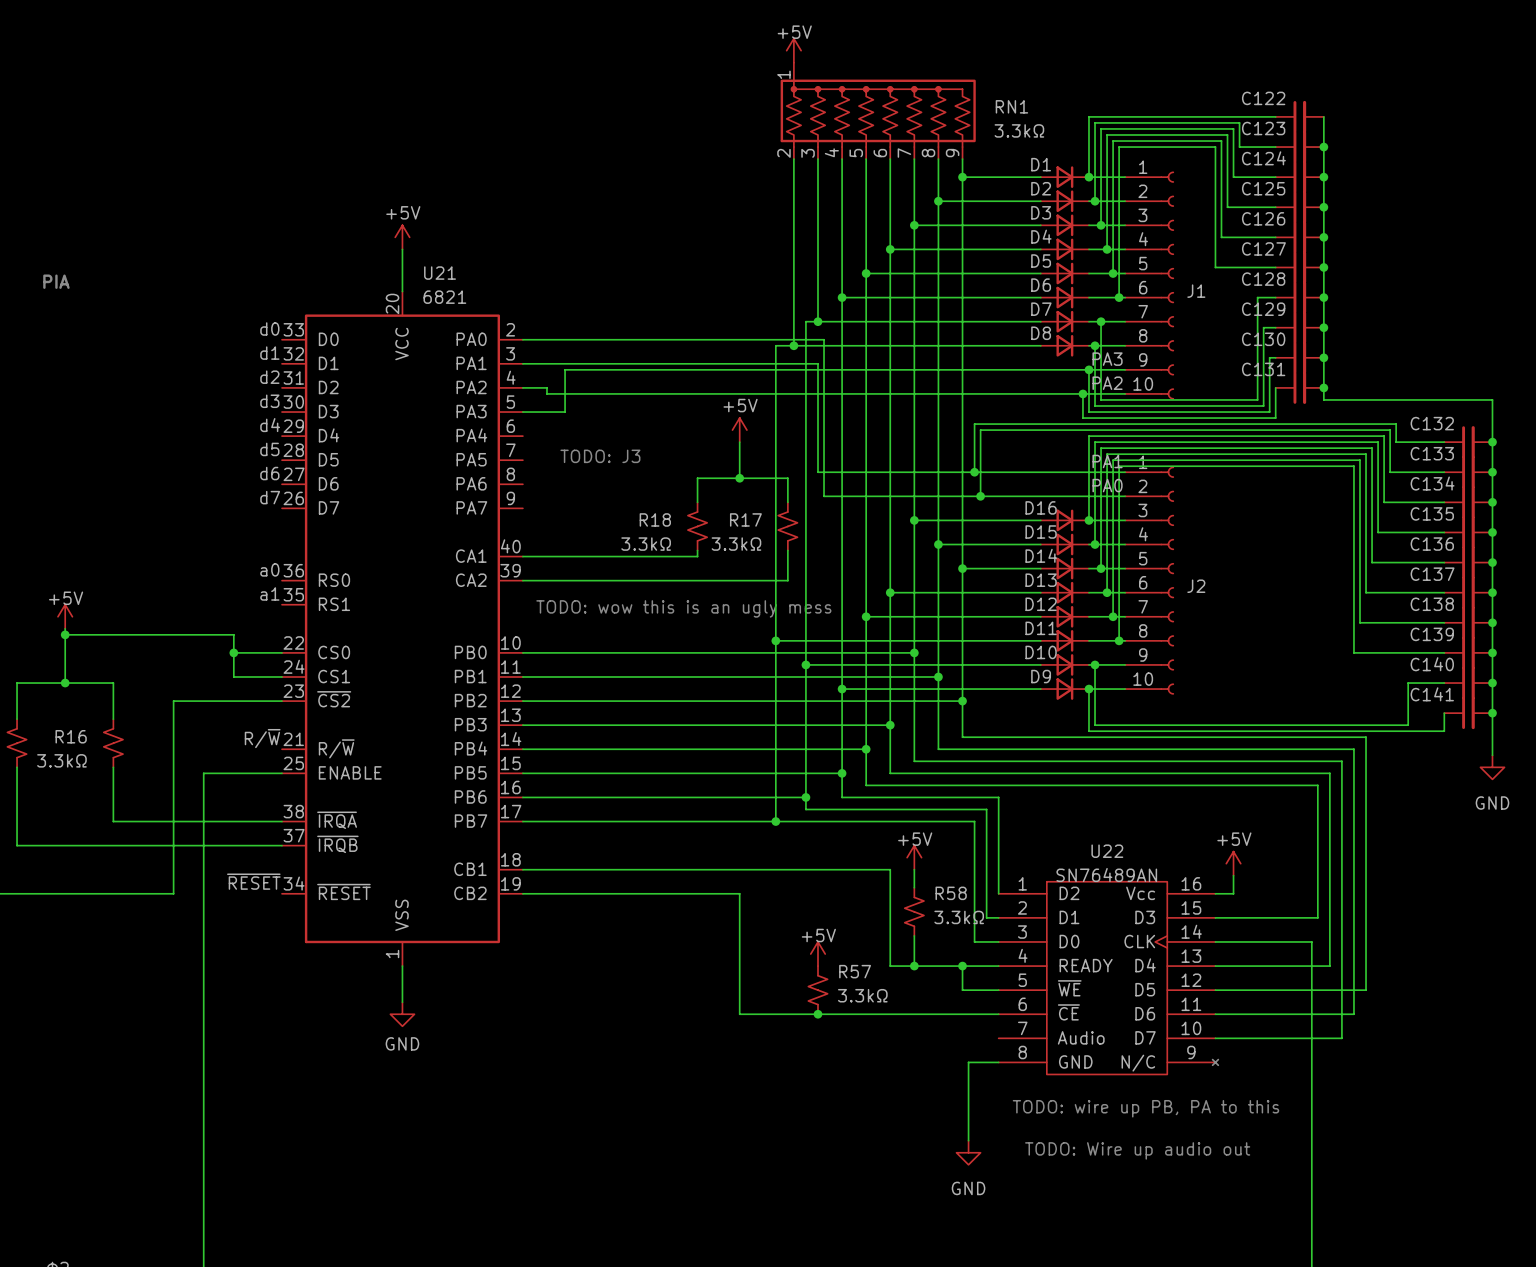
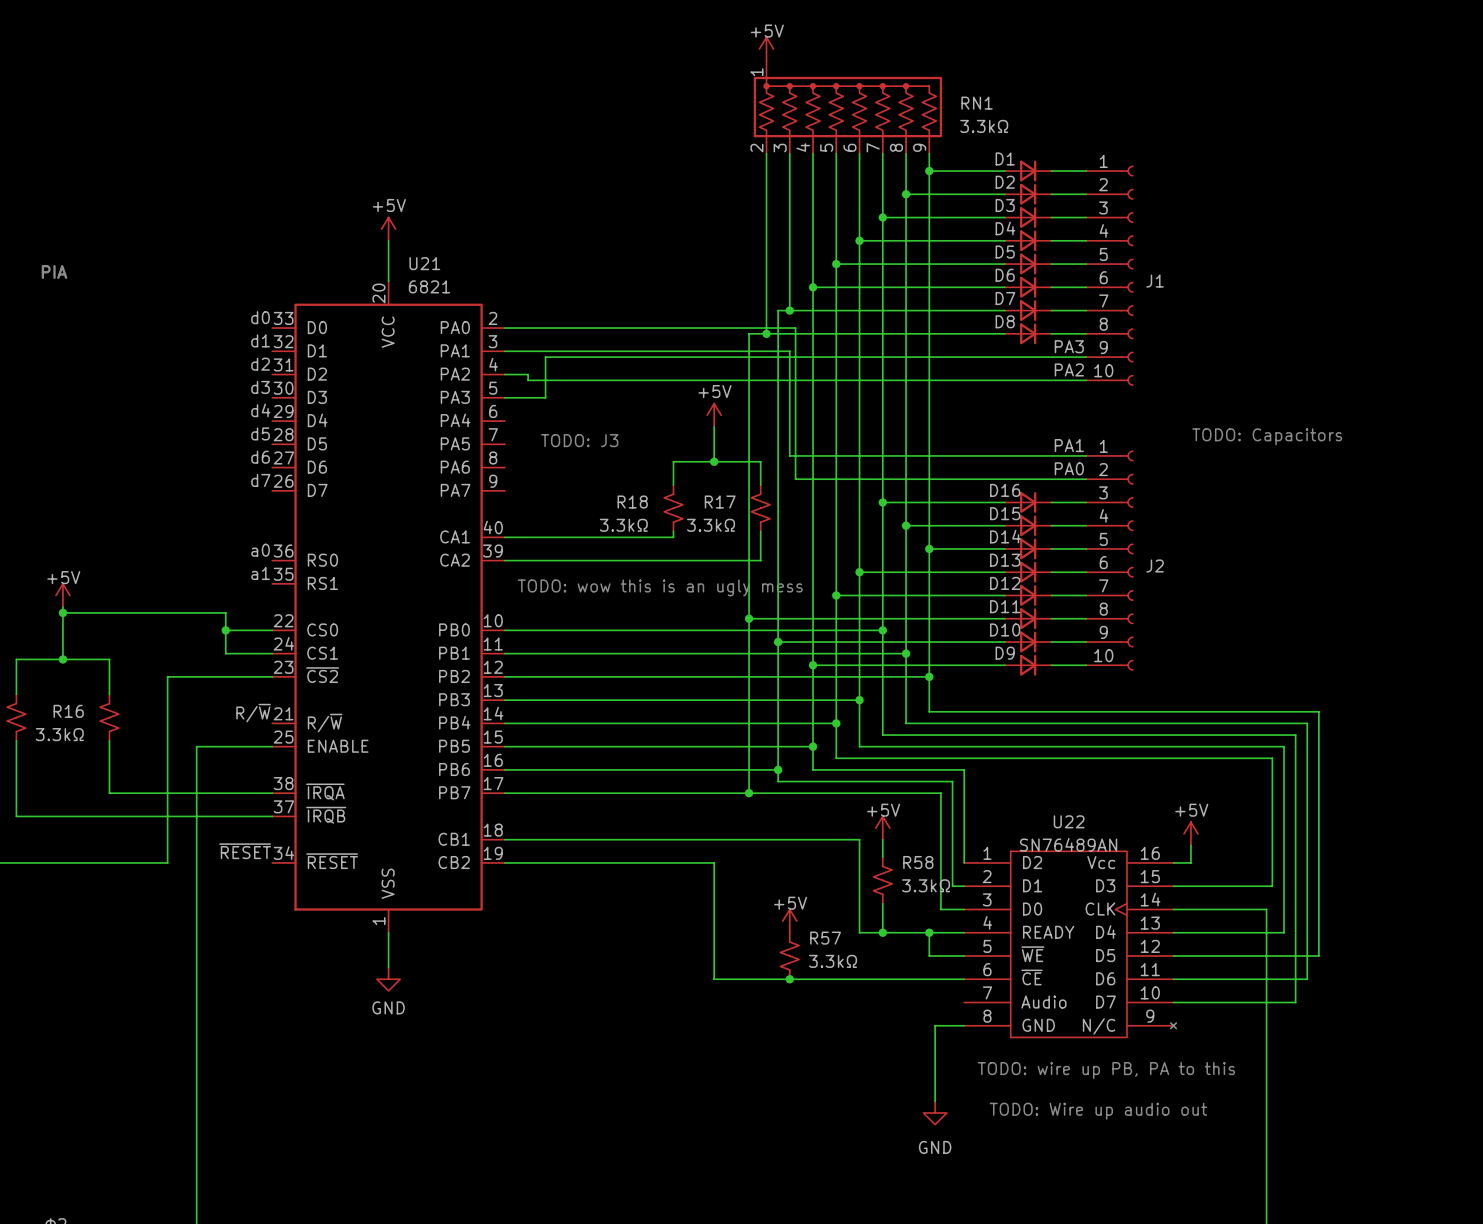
wire: (1275, 116) (1088, 116) (1088, 177) -> none
C122: (1299, 116) -> none
wire: (1323, 116) (1323, 399) (1492, 399) (1492, 755) -> none
wire: (1275, 147) (1239, 147) (1239, 122) (1095, 122) (1095, 201) -> none
C123: (1299, 147) -> none
junction: (1323, 147) -> none
junction: (1088, 177) -> none
wire: (1275, 177) (1233, 177) (1233, 128) (1101, 128) (1101, 225) -> none
C124: (1299, 177) -> none
junction: (1323, 177) -> none
junction: (1095, 201) -> none
wire: (1275, 207) (1227, 207) (1227, 134) (1107, 134) (1107, 249) -> none
C125: (1299, 207) -> none
junction: (1323, 207) -> none
junction: (1101, 225) -> none
wire: (1275, 237) (1221, 237) (1221, 141) (1113, 141) (1113, 273) -> none
C126: (1299, 237) -> none
junction: (1323, 237) -> none
junction: (1107, 249) -> none
wire: (1275, 267) (1215, 267) (1215, 147) (1119, 147) (1119, 297) -> none
C127: (1299, 267) -> none
junction: (1323, 267) -> none
junction: (1113, 273) -> none
junction: (1119, 297) -> none
wire: (1275, 297) (1257, 297) (1257, 399) (1101, 399) (1101, 321) -> none
C128: (1299, 297) -> none
junction: (1323, 297) -> none
junction: (1101, 321) -> none
wire: (1275, 327) (1263, 327) (1263, 405) (1095, 405) (1095, 345) -> none
C129: (1299, 327) -> none
junction: (1323, 327) -> none
junction: (1095, 345) -> none
wire: (1275, 357) (1269, 357) (1269, 412) (1088, 412) (1088, 369) -> none
C130: (1299, 357) -> none
junction: (1323, 357) -> none
junction: (1088, 369) -> none
wire: (1275, 387) (1275, 418) (1082, 418) (1082, 393) -> none
C131: (1299, 387) -> none
junction: (1323, 387) -> none
junction: (1082, 393) -> none
wire: (1444, 442) (1396, 442) (1396, 424) (974, 424) (974, 472) -> none
C132: (1468, 442) -> none
junction: (1492, 442) -> none
text: none -> TODO: Capacitors (1267, 436)
junction: (974, 472) -> none
wire: (1444, 472) (1390, 472) (1390, 430) (980, 430) (980, 496) -> none
C133: (1468, 472) -> none
junction: (1492, 472) -> none
junction: (980, 496) -> none
wire: (1444, 502) (1384, 502) (1384, 436) (1088, 436) (1088, 520) -> none
C134: (1468, 502) -> none
junction: (1492, 502) -> none
junction: (1088, 520) -> none
wire: (1444, 532) (1378, 532) (1378, 442) (1095, 442) (1095, 544) -> none
C135: (1468, 532) -> none
junction: (1492, 532) -> none
junction: (1095, 544) -> none
wire: (1444, 562) (1372, 562) (1372, 448) (1101, 448) (1101, 568) -> none
C136: (1468, 562) -> none
junction: (1492, 562) -> none
junction: (1101, 568) -> none
wire: (1107, 592) (1107, 454) (1366, 454) (1366, 592) (1444, 592) -> none
junction: (1107, 592) -> none
C137: (1468, 592) -> none
junction: (1492, 592) -> none
wire: (1113, 616) (1113, 460) (1359, 460) (1359, 622) (1444, 622) -> none
junction: (1113, 616) -> none
C138: (1468, 622) -> none
junction: (1492, 622) -> none
wire: (1119, 640) (1119, 466) (1353, 466) (1353, 652) (1444, 652) -> none
junction: (1119, 640) -> none
C139: (1468, 652) -> none
junction: (1492, 652) -> none
wire: (1095, 664) (1095, 725) (1408, 725) (1408, 683) (1444, 683) -> none
junction: (1095, 664) -> none
C140: (1468, 683) -> none
junction: (1492, 683) -> none
wire: (1088, 689) (1088, 731) (1444, 731) (1444, 713) -> none
junction: (1088, 689) -> none
C141: (1468, 713) -> none
junction: (1492, 713) -> none
power symbol: GND (1492, 767) -> none

